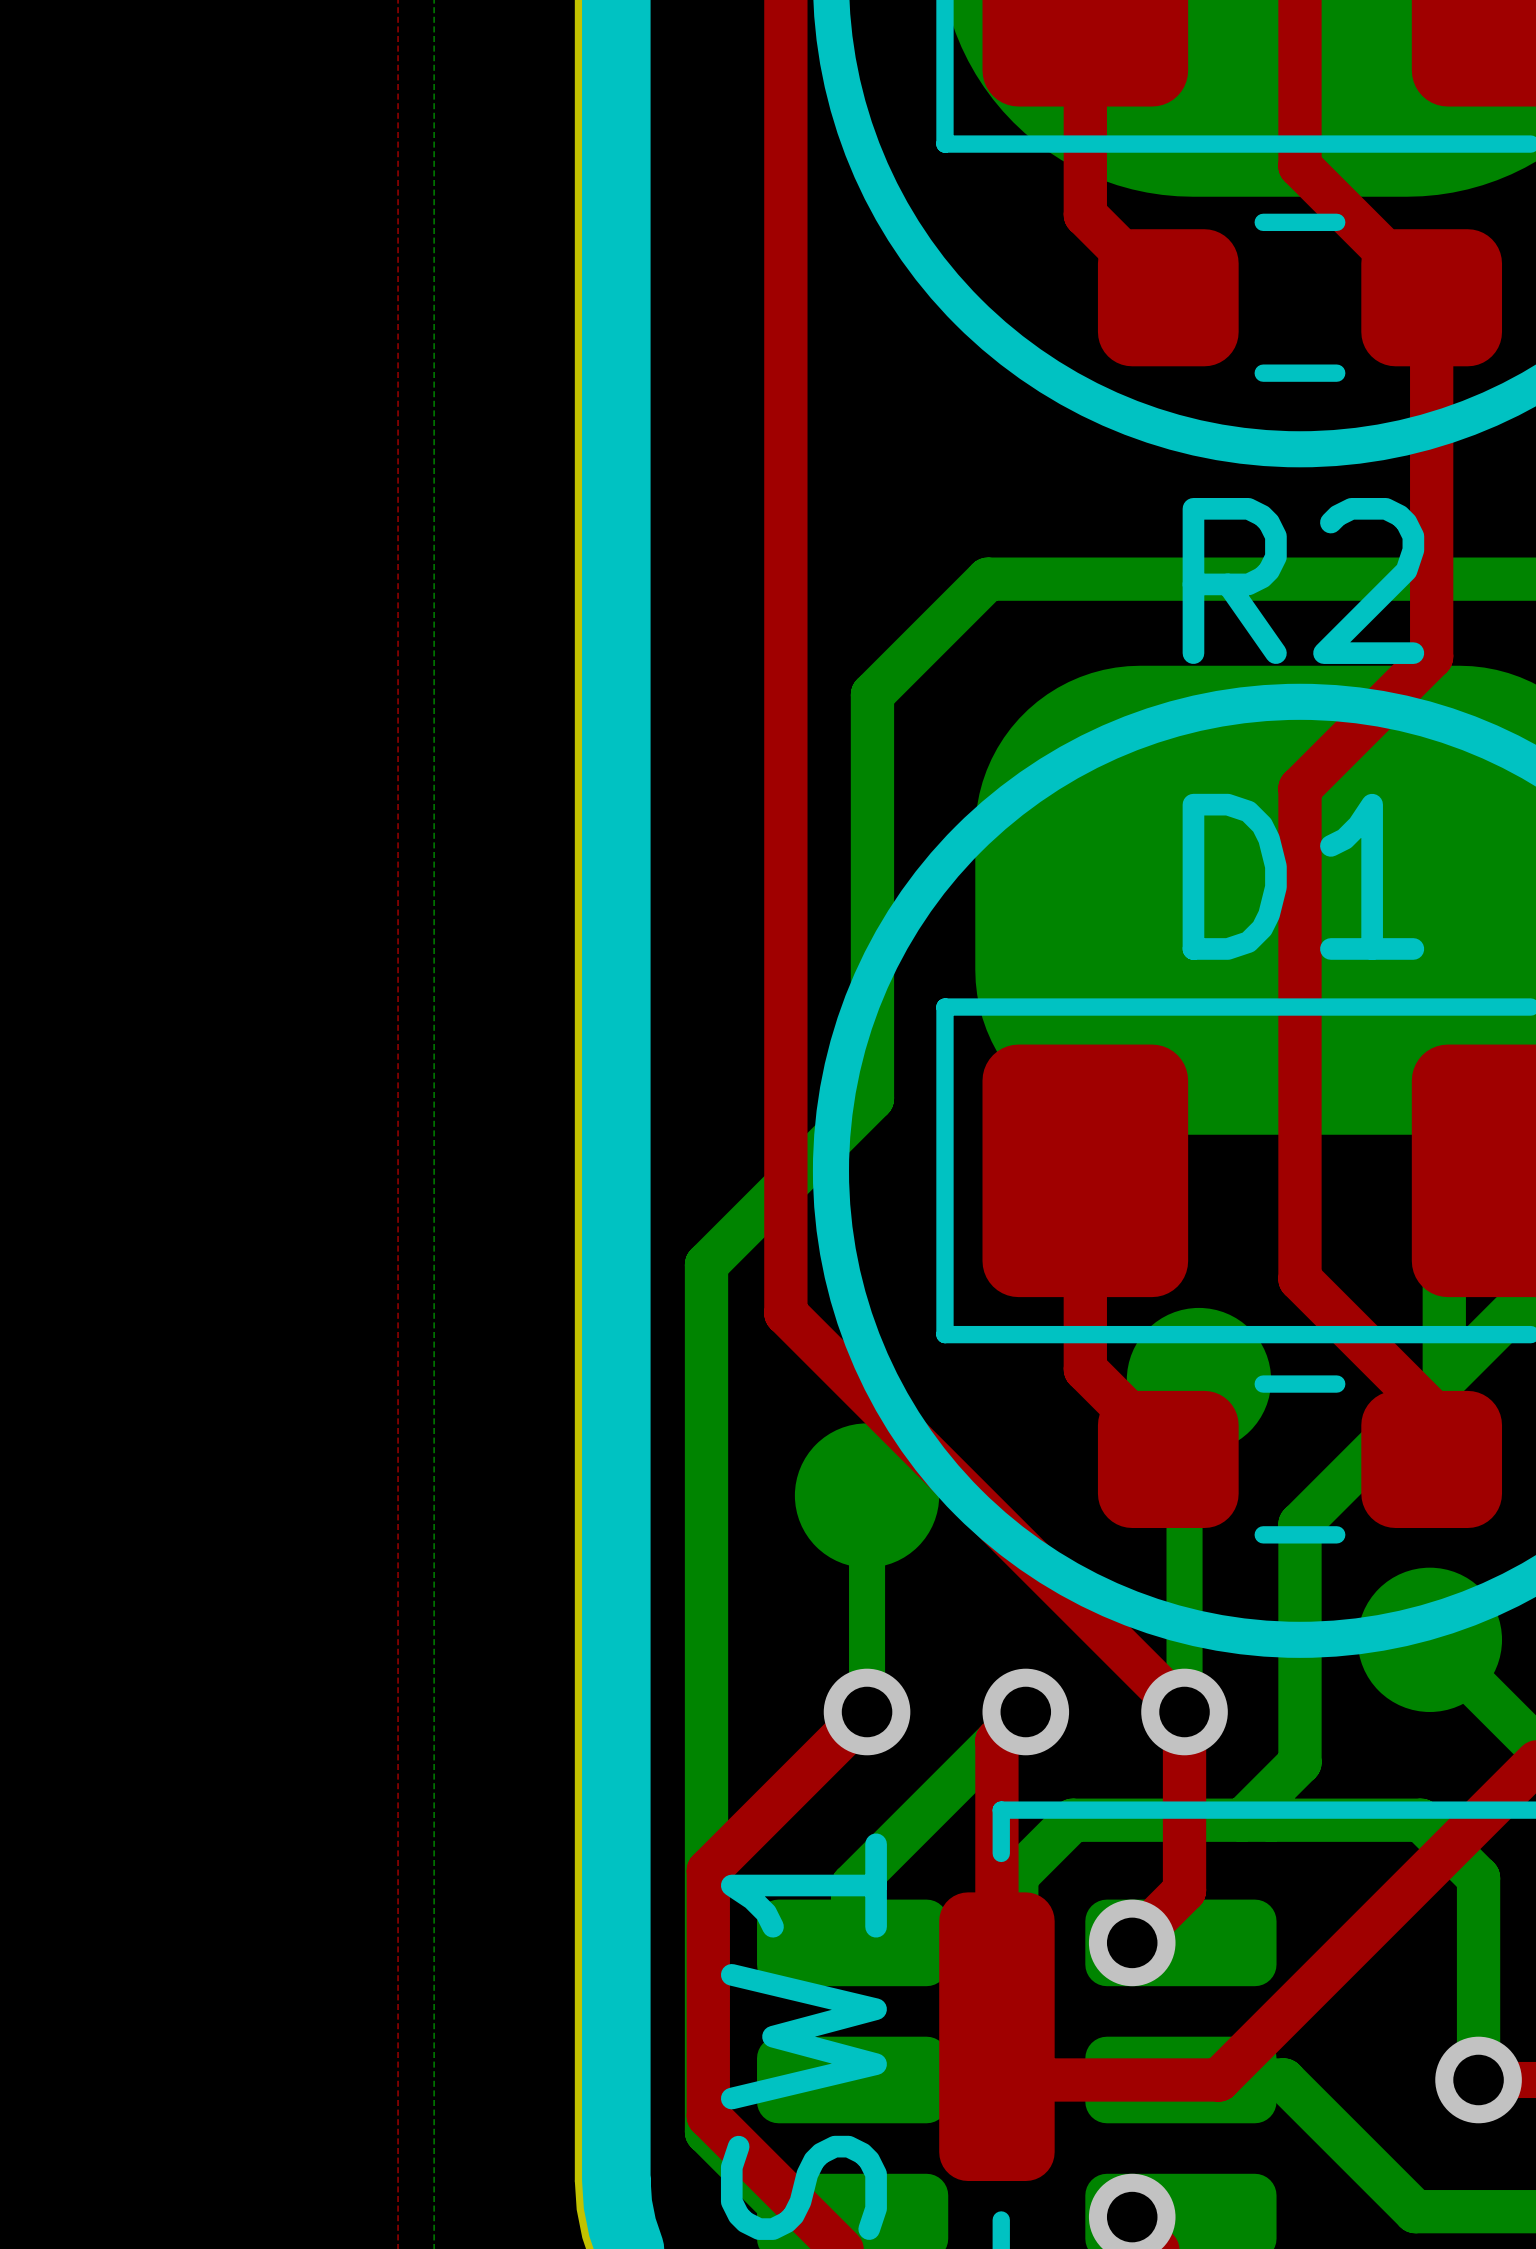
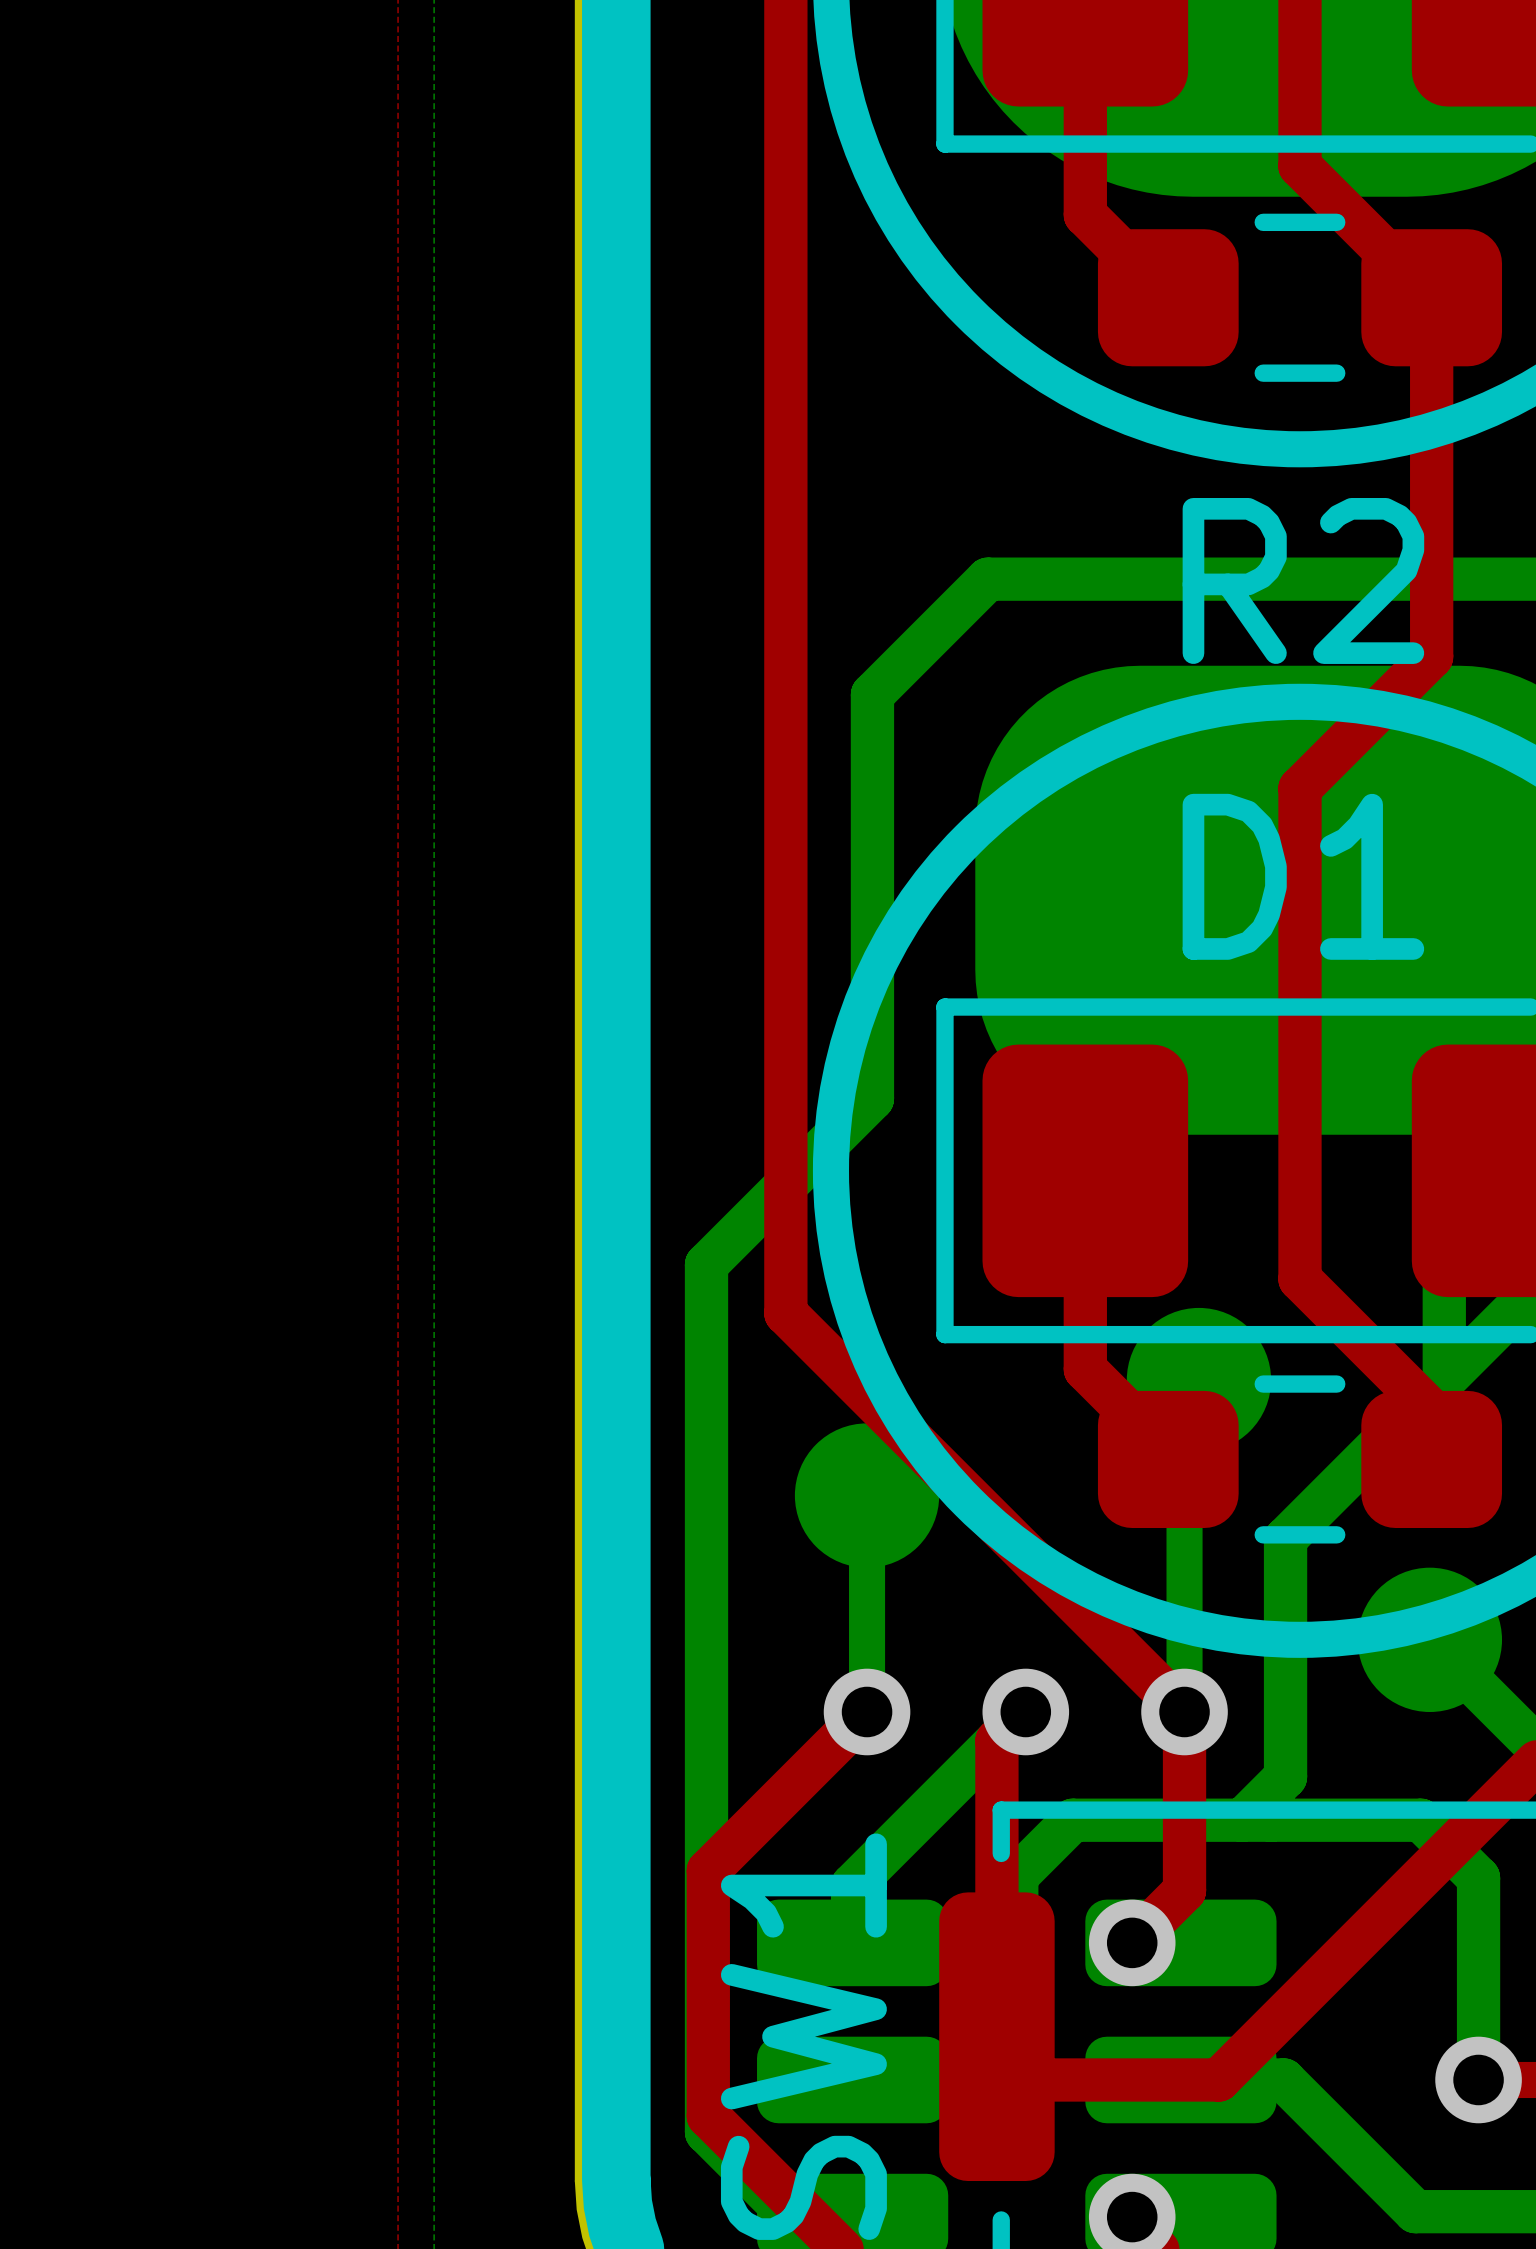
bottom track: (1299, 1524) (1299, 1762) (1285, 1776) -> (1299, 1524) (1285, 1538) (1285, 1776)

